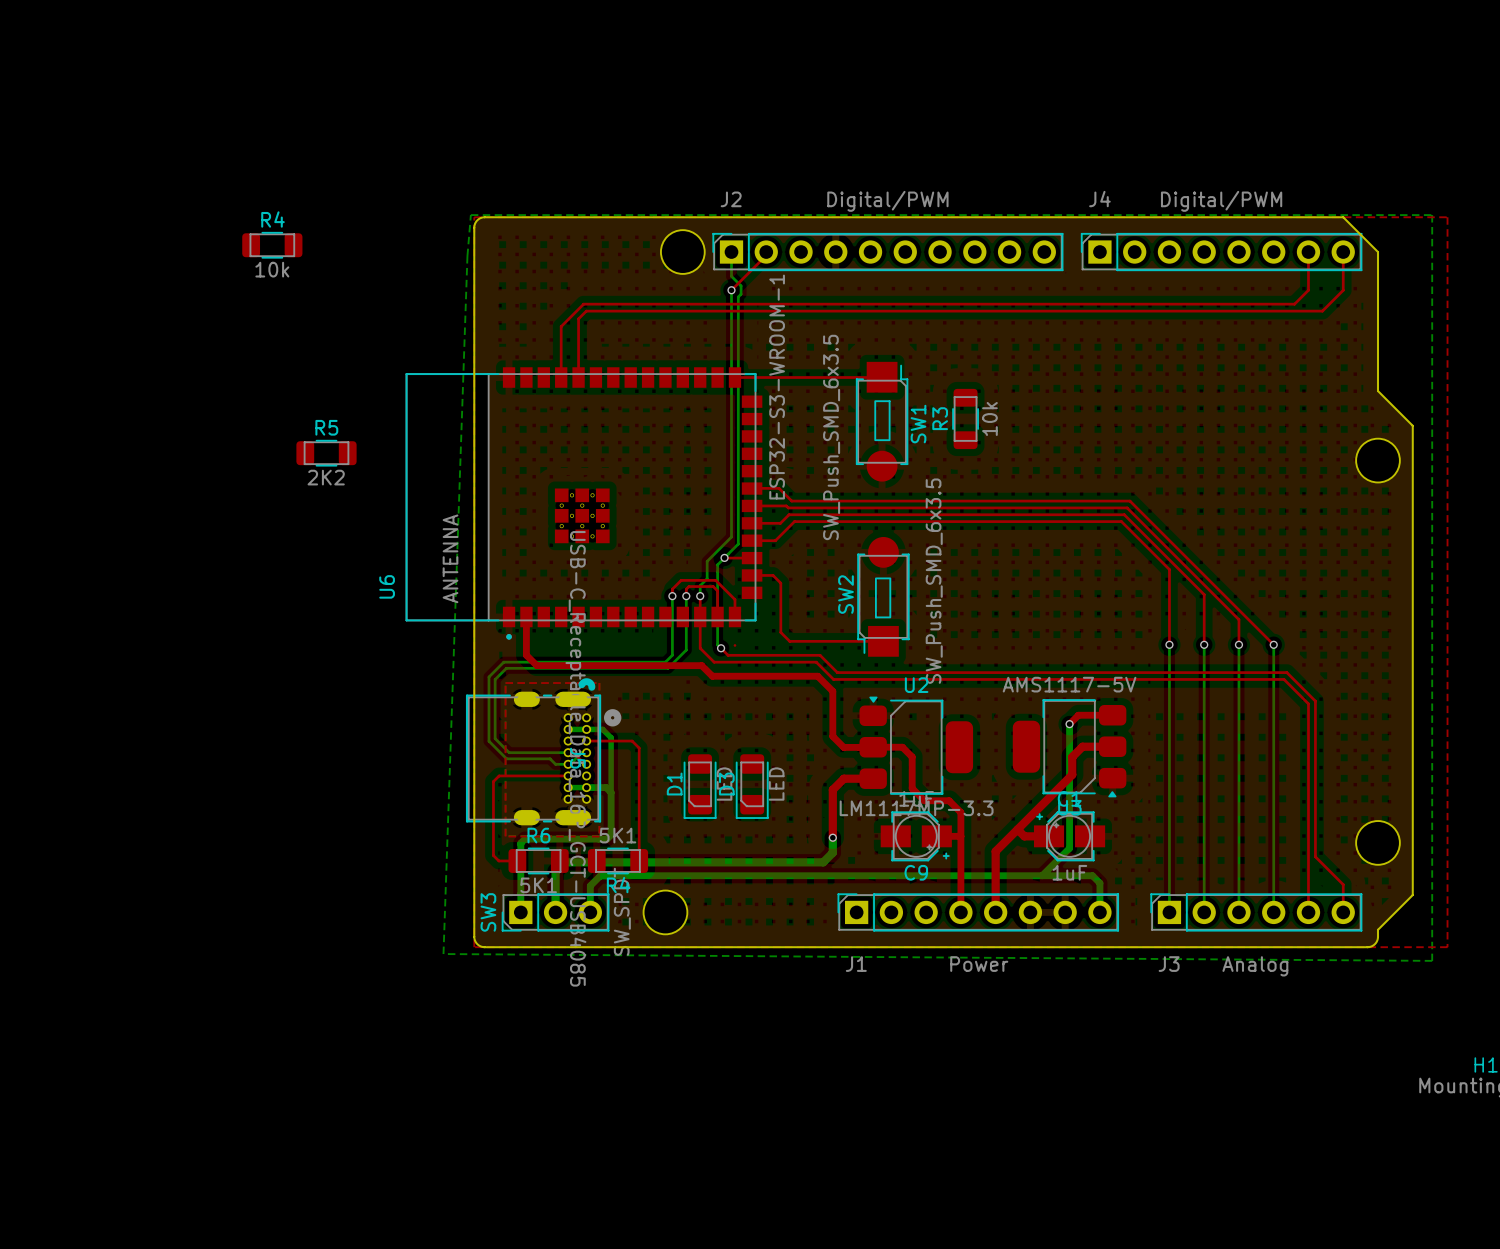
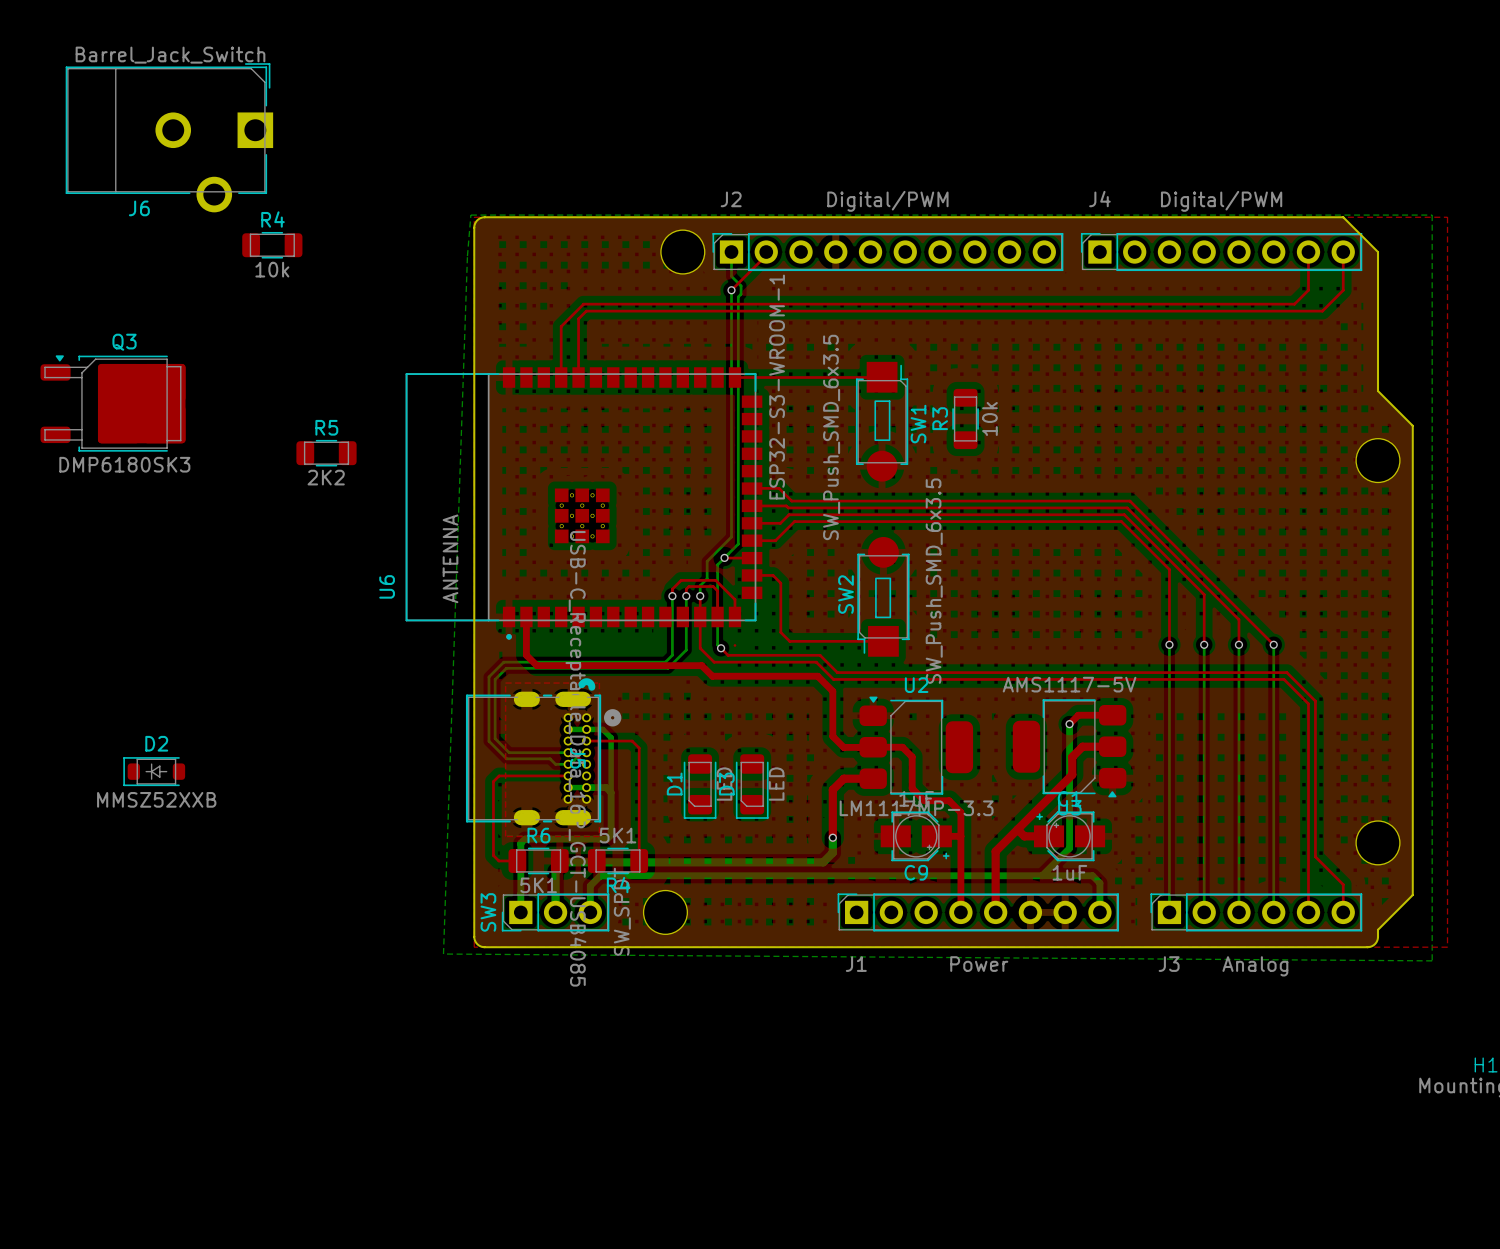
J6: none -> Barrel_Jack_Switch (169, 137)
Q3: none -> DMP6180SK3 (113, 403)
D2: none -> MMSZ52XXB (154, 771)

